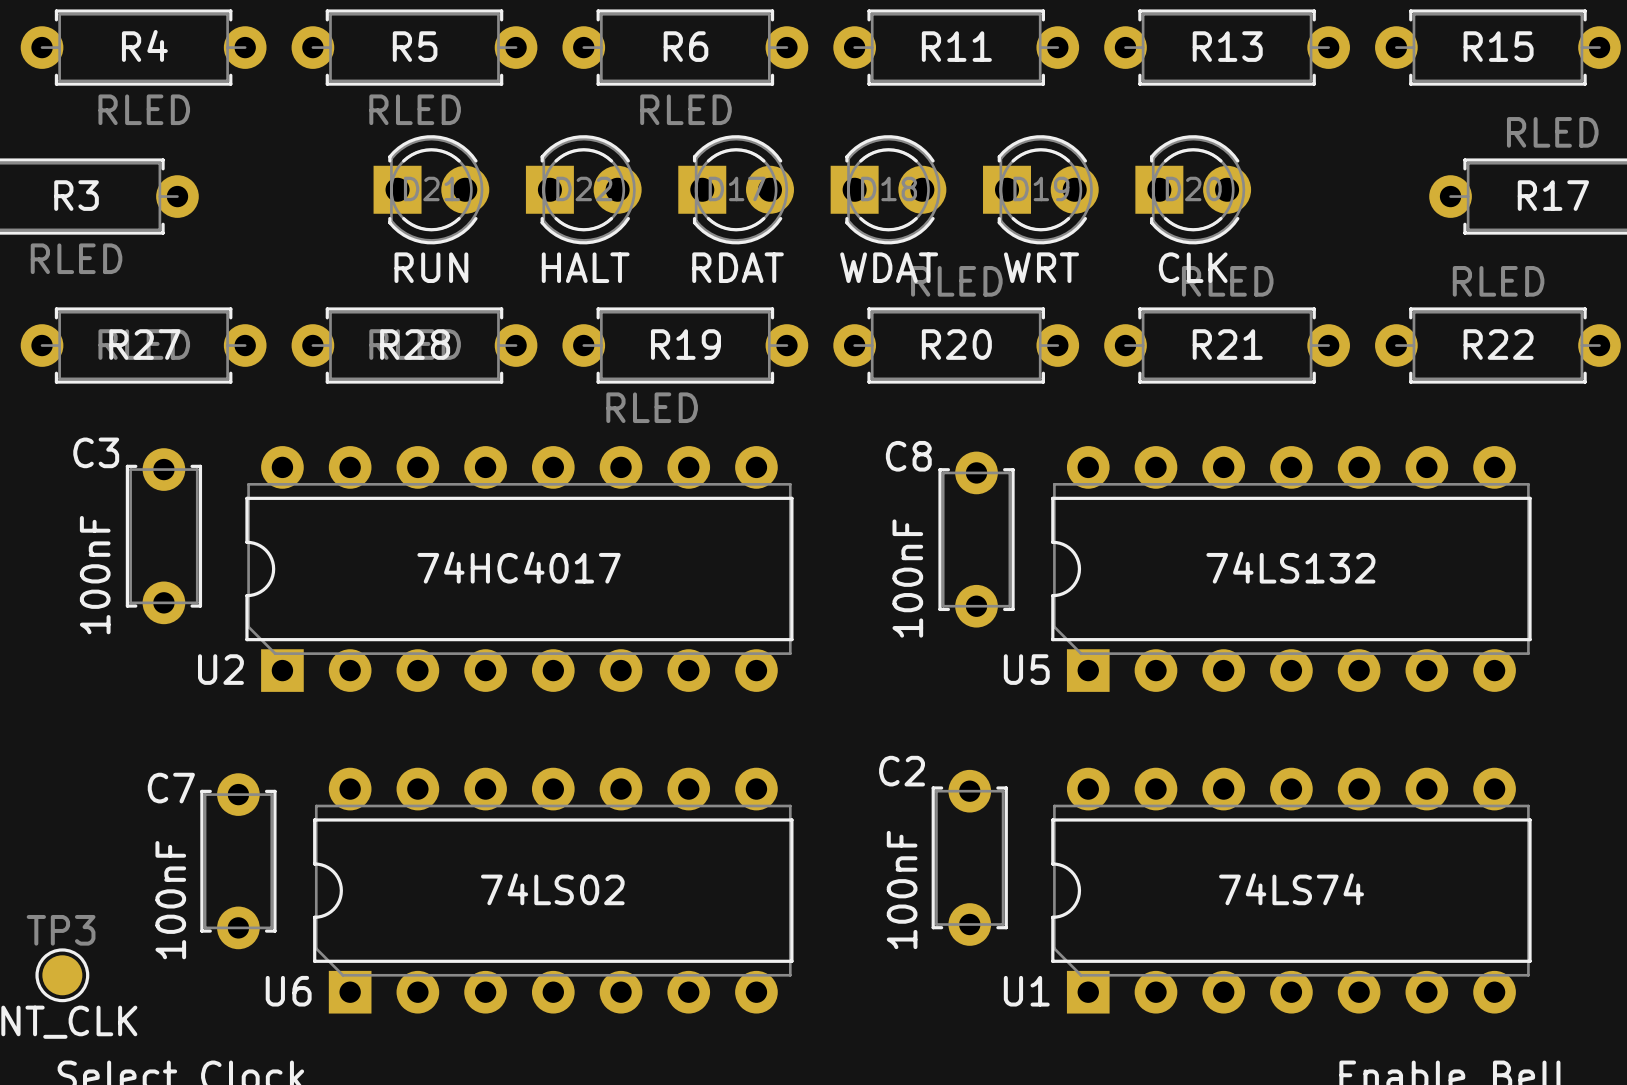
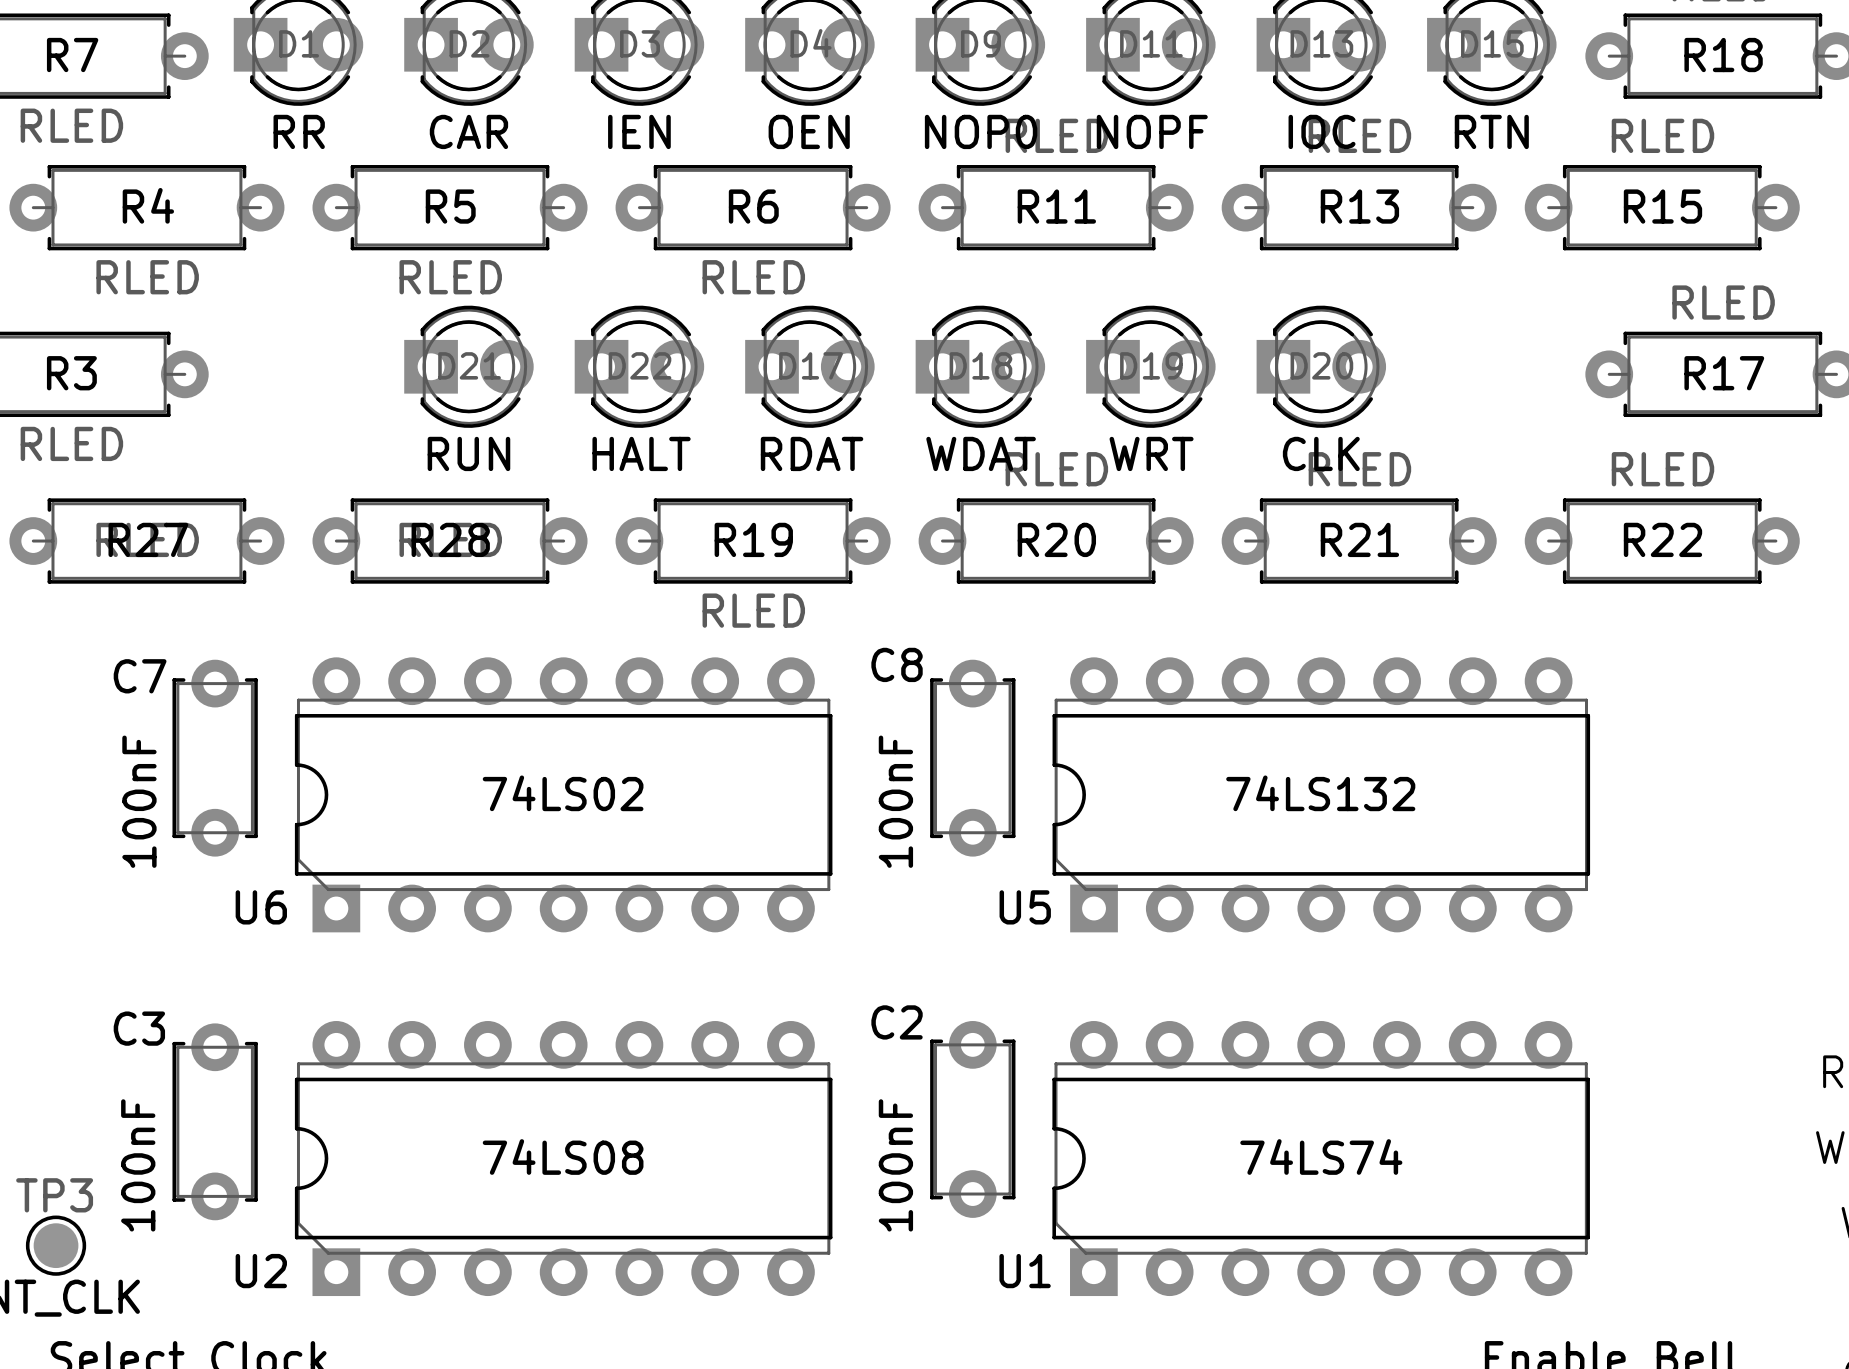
R19 value position: RLED (652, 407) -> RLED (753, 610)
U2 footprint: [245, 446, 794, 692] -> [294, 1021, 833, 1297]
C3 position: (163, 536) -> (215, 1121)
C8 position: (976, 539) -> (972, 758)
U2 value: 74HC4017 (519, 567) -> 74LS08 (563, 1157)
U5 position: (1291, 568) -> (1321, 794)
C2 position: (969, 857) -> (972, 1119)
C7 position: (238, 861) -> (215, 758)
U6 position: (553, 890) -> (563, 794)
C2 value position: 100nF (902, 890) -> 100nF (895, 1165)
U1 position: (1291, 890) -> (1321, 1158)
U6 name position: U6 (288, 991) -> U6 (261, 907)

